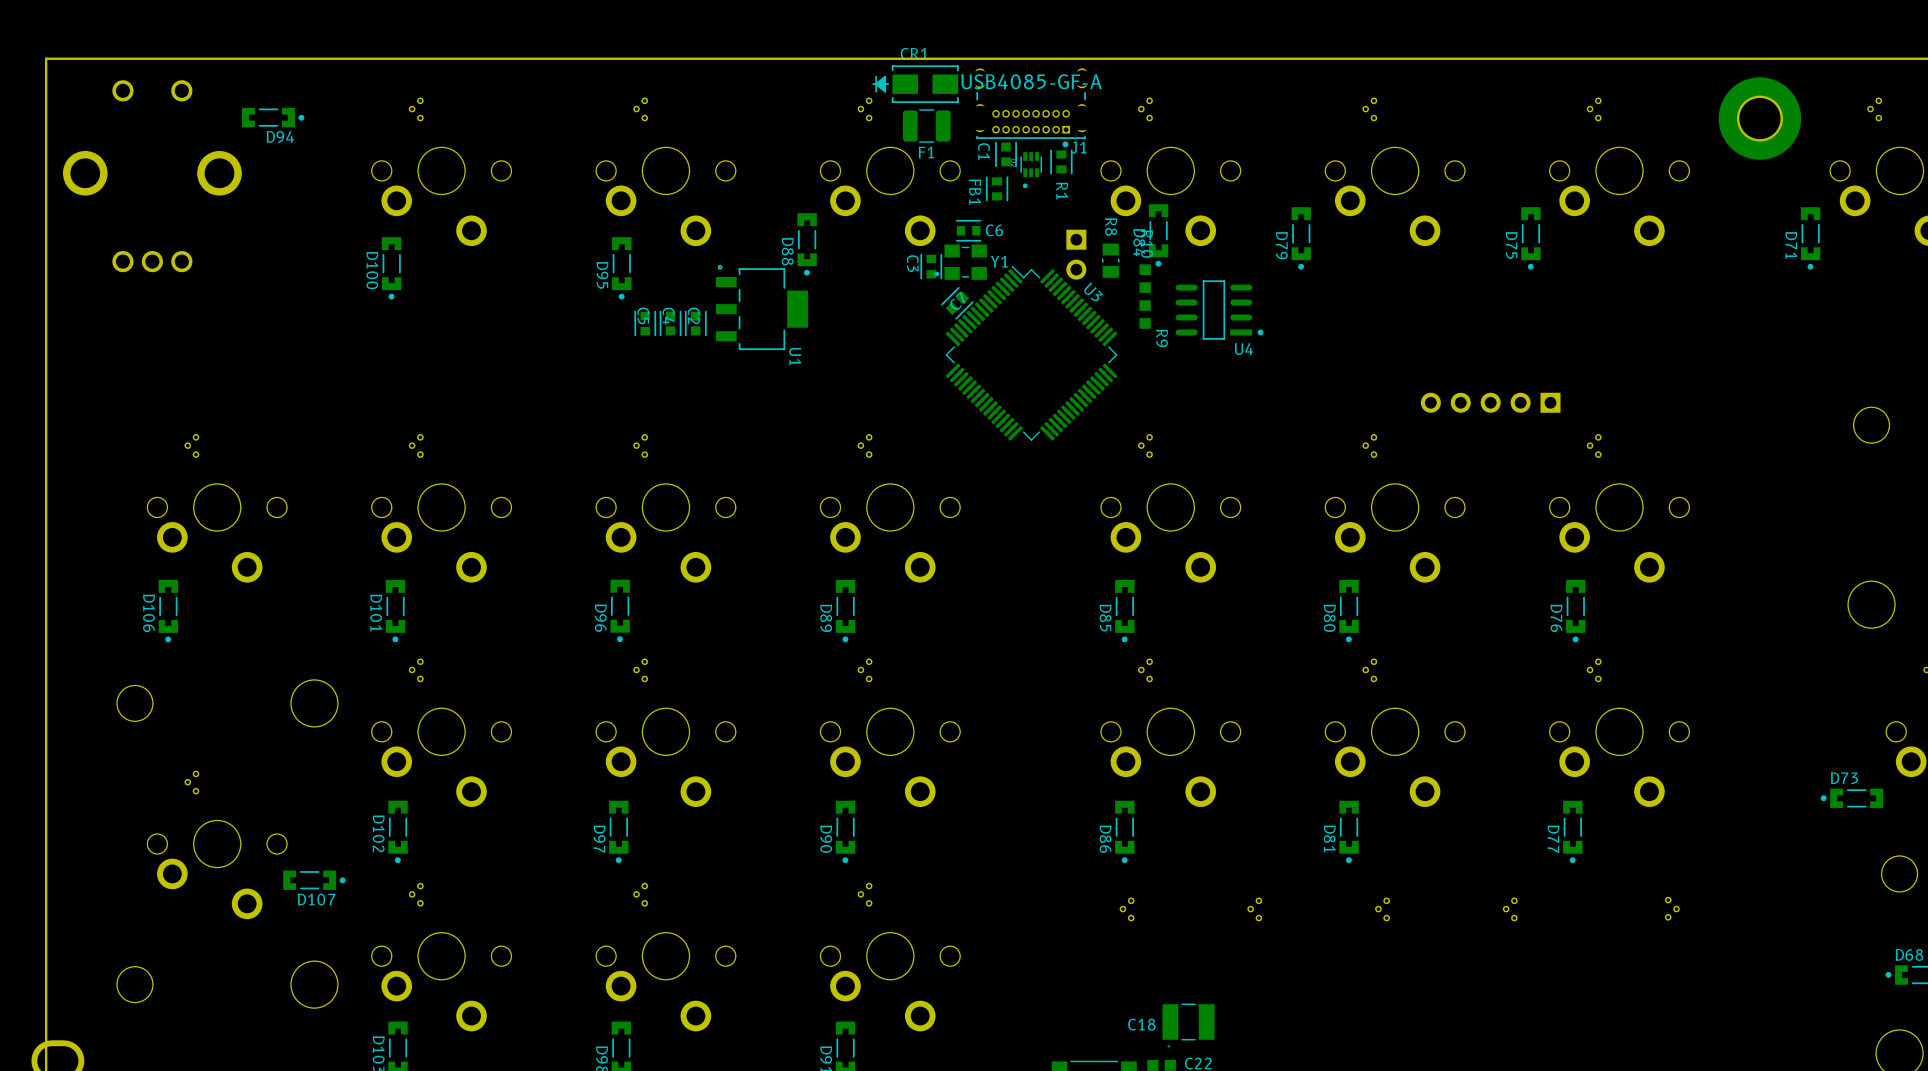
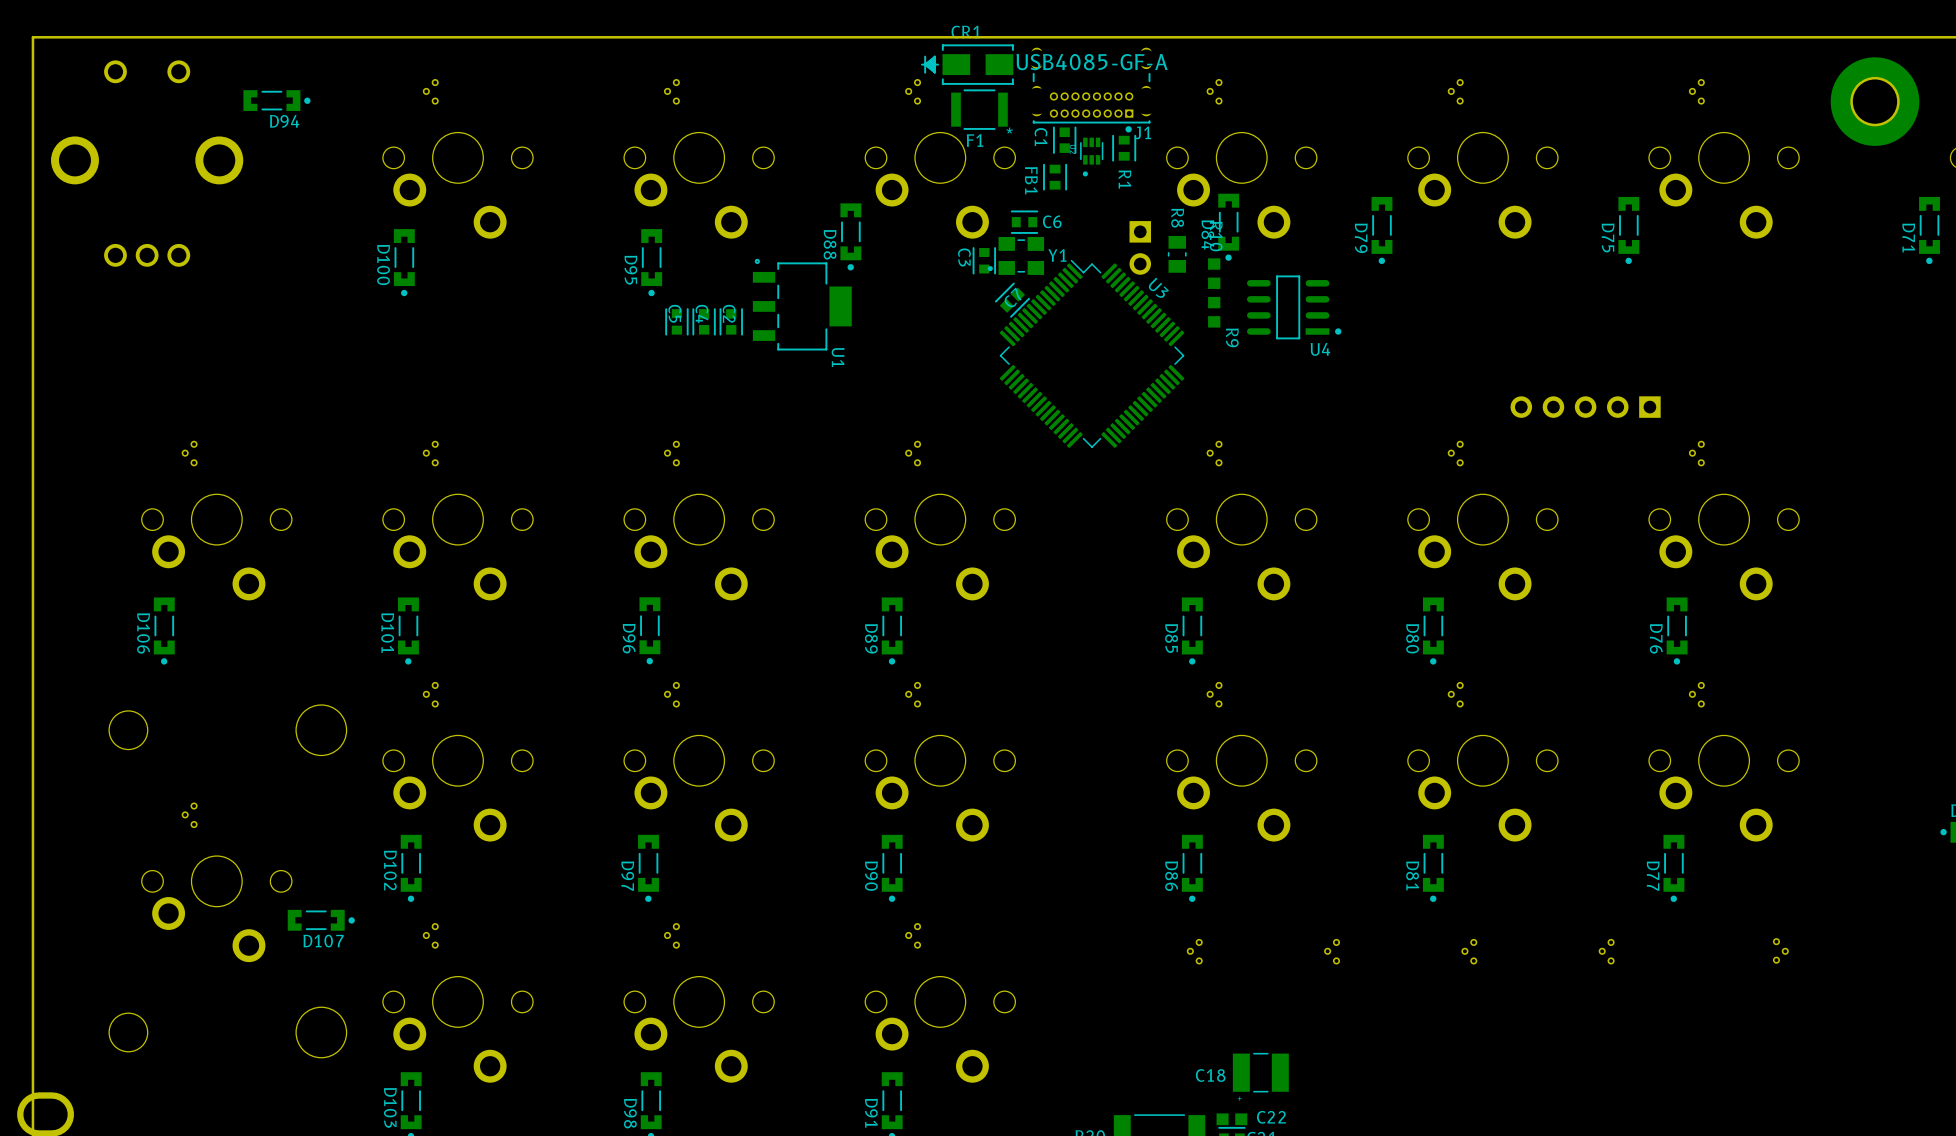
F1 footprint: [902, 109, 951, 143] -> [951, 89, 1008, 130]

